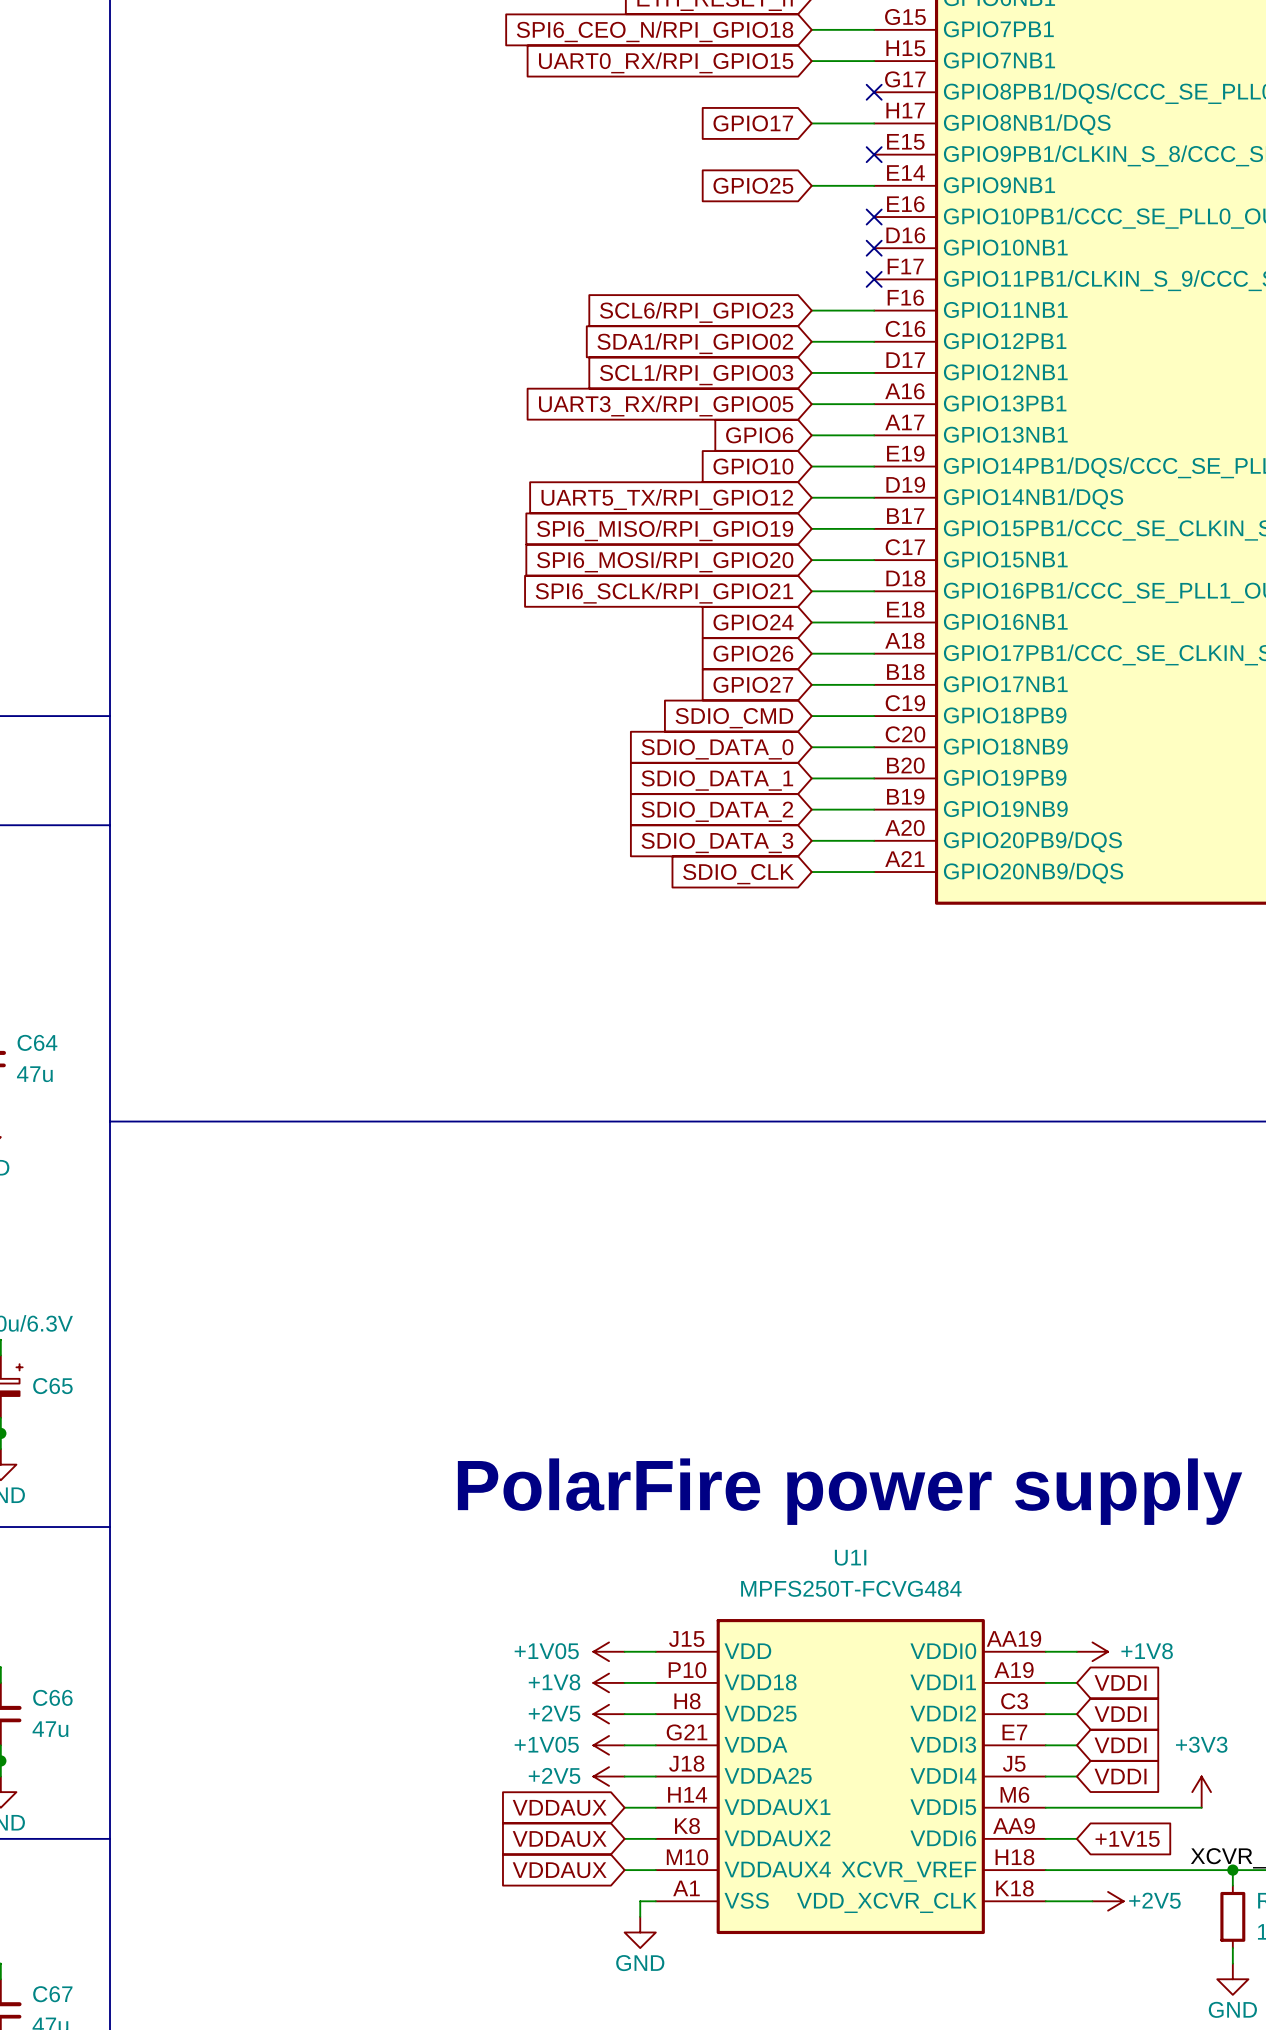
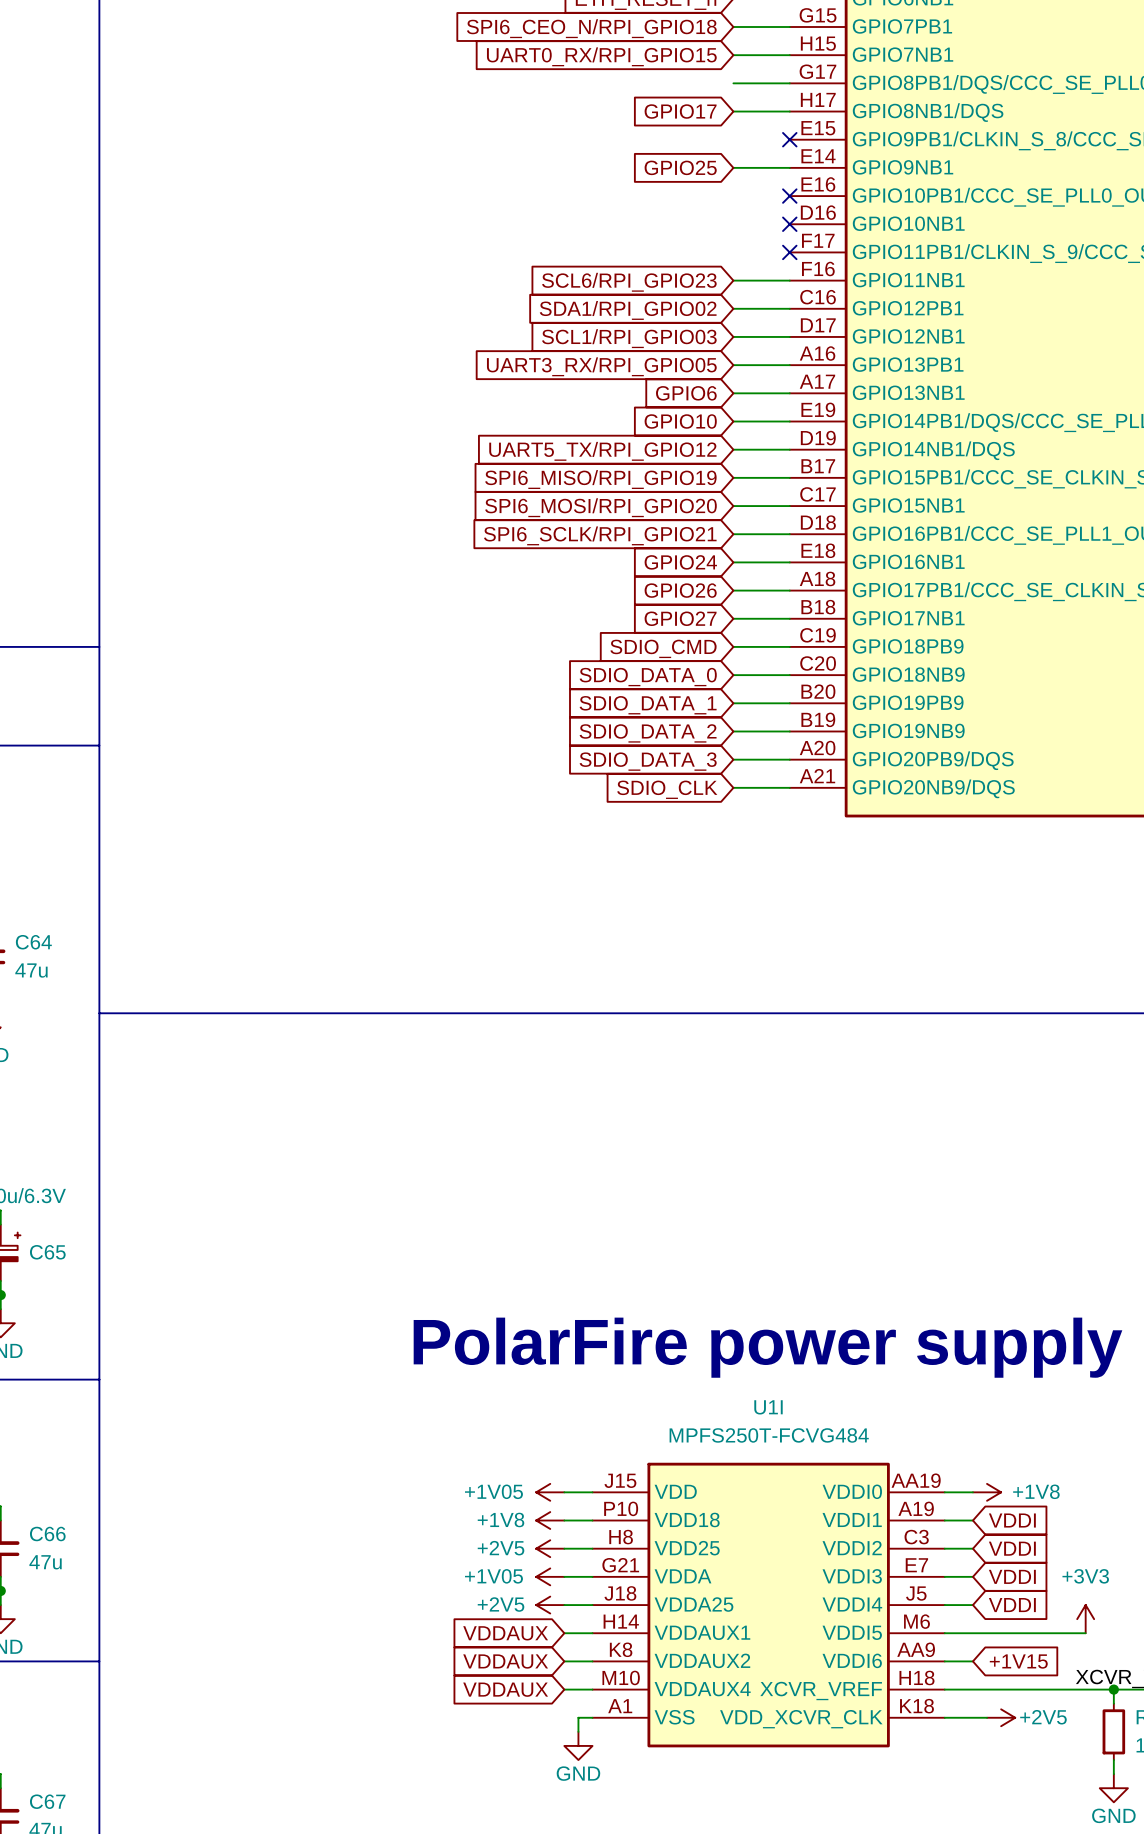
wire: none -> (733, 83) (789, 83)
no-connect mark: (874, 92) -> none

